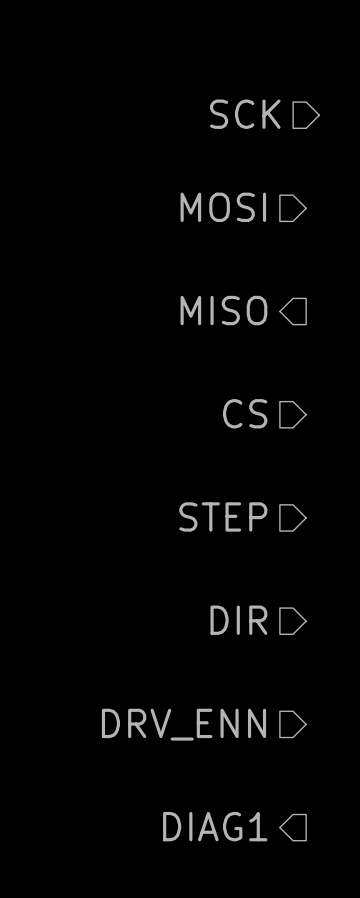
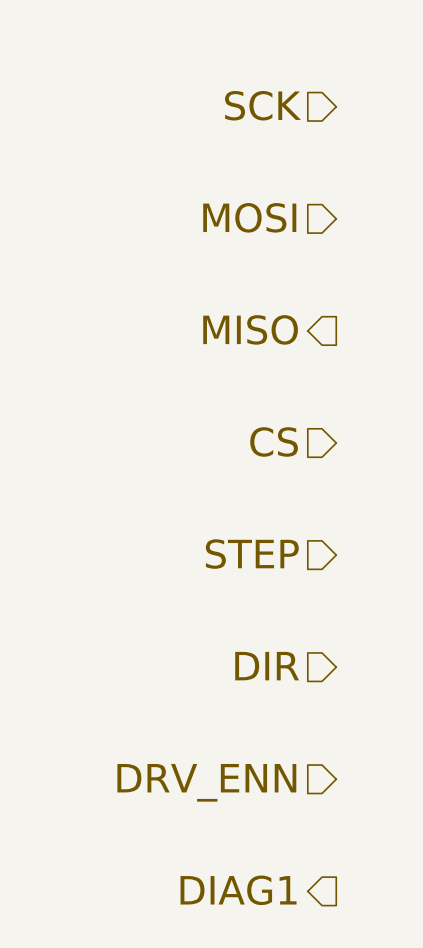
hierarchical label position: SCK (245, 114) -> SCK (262, 105)

